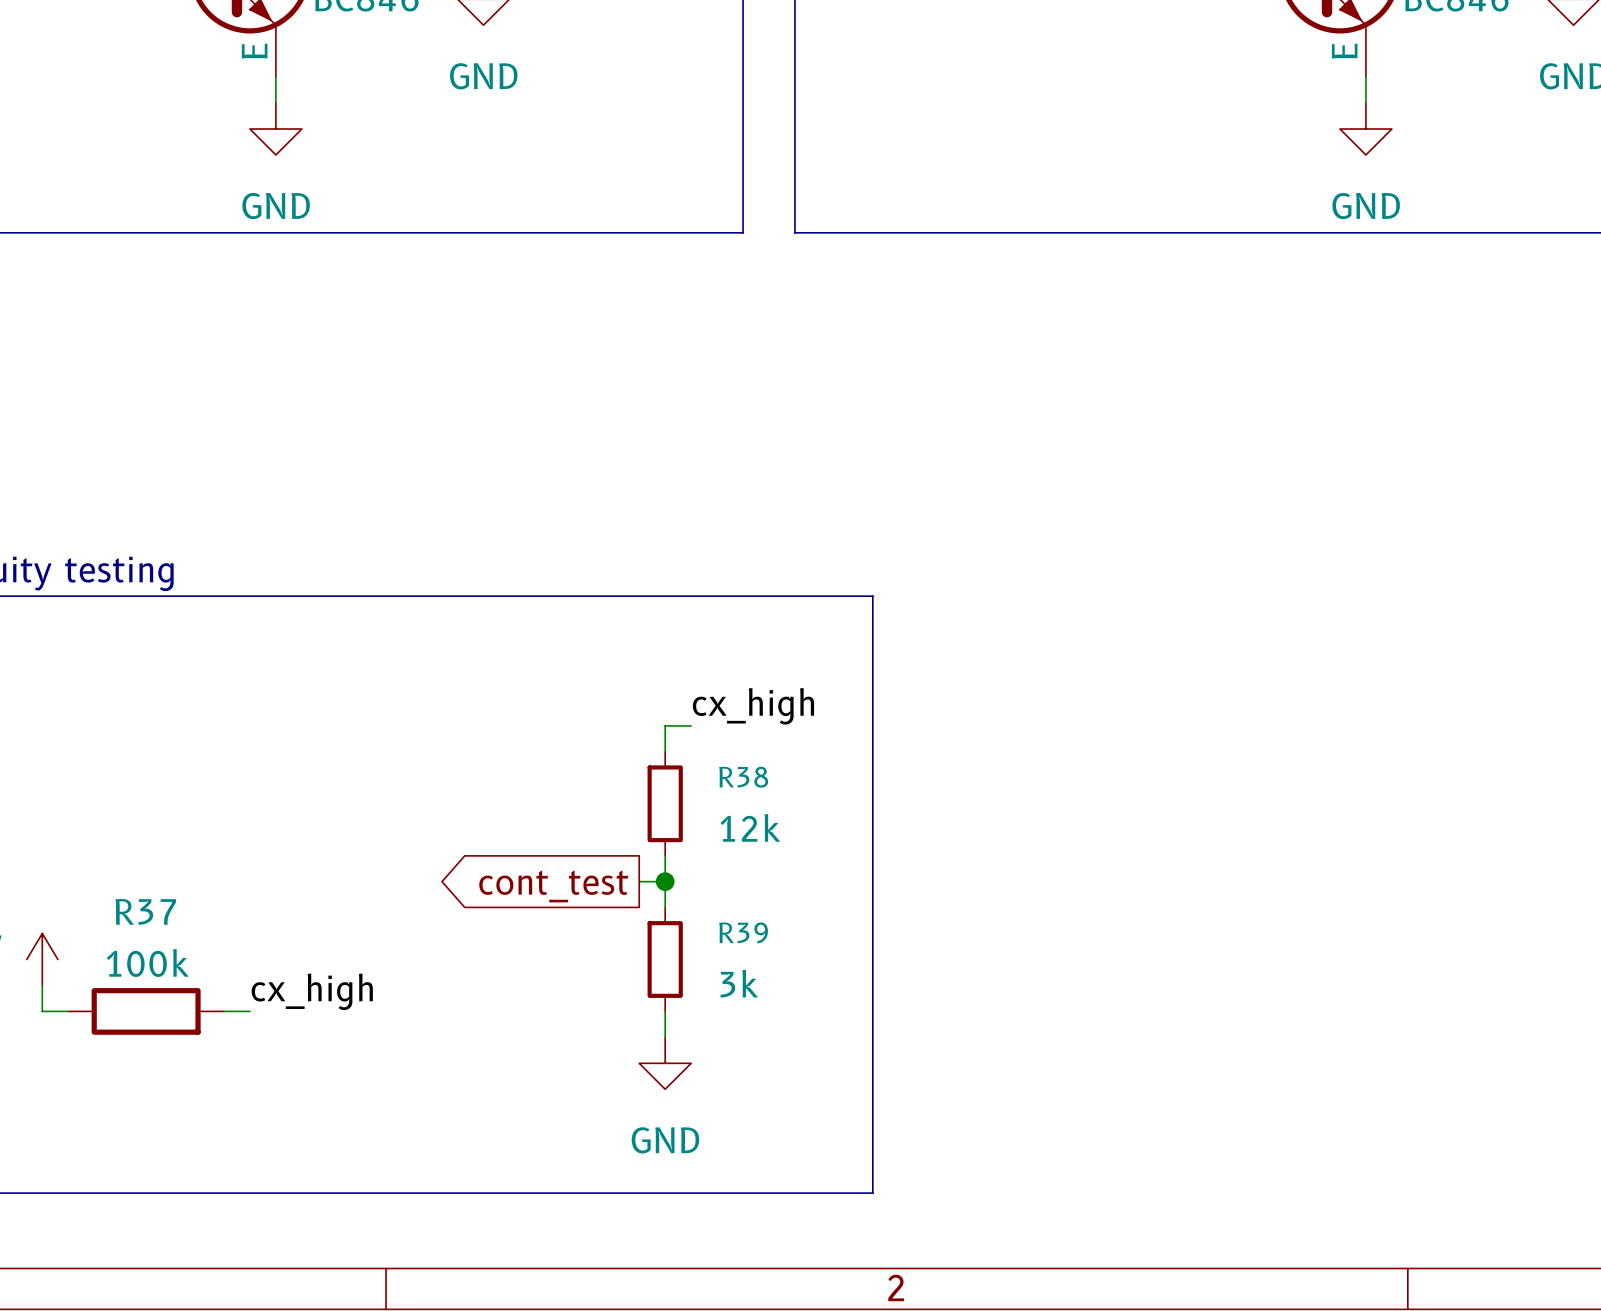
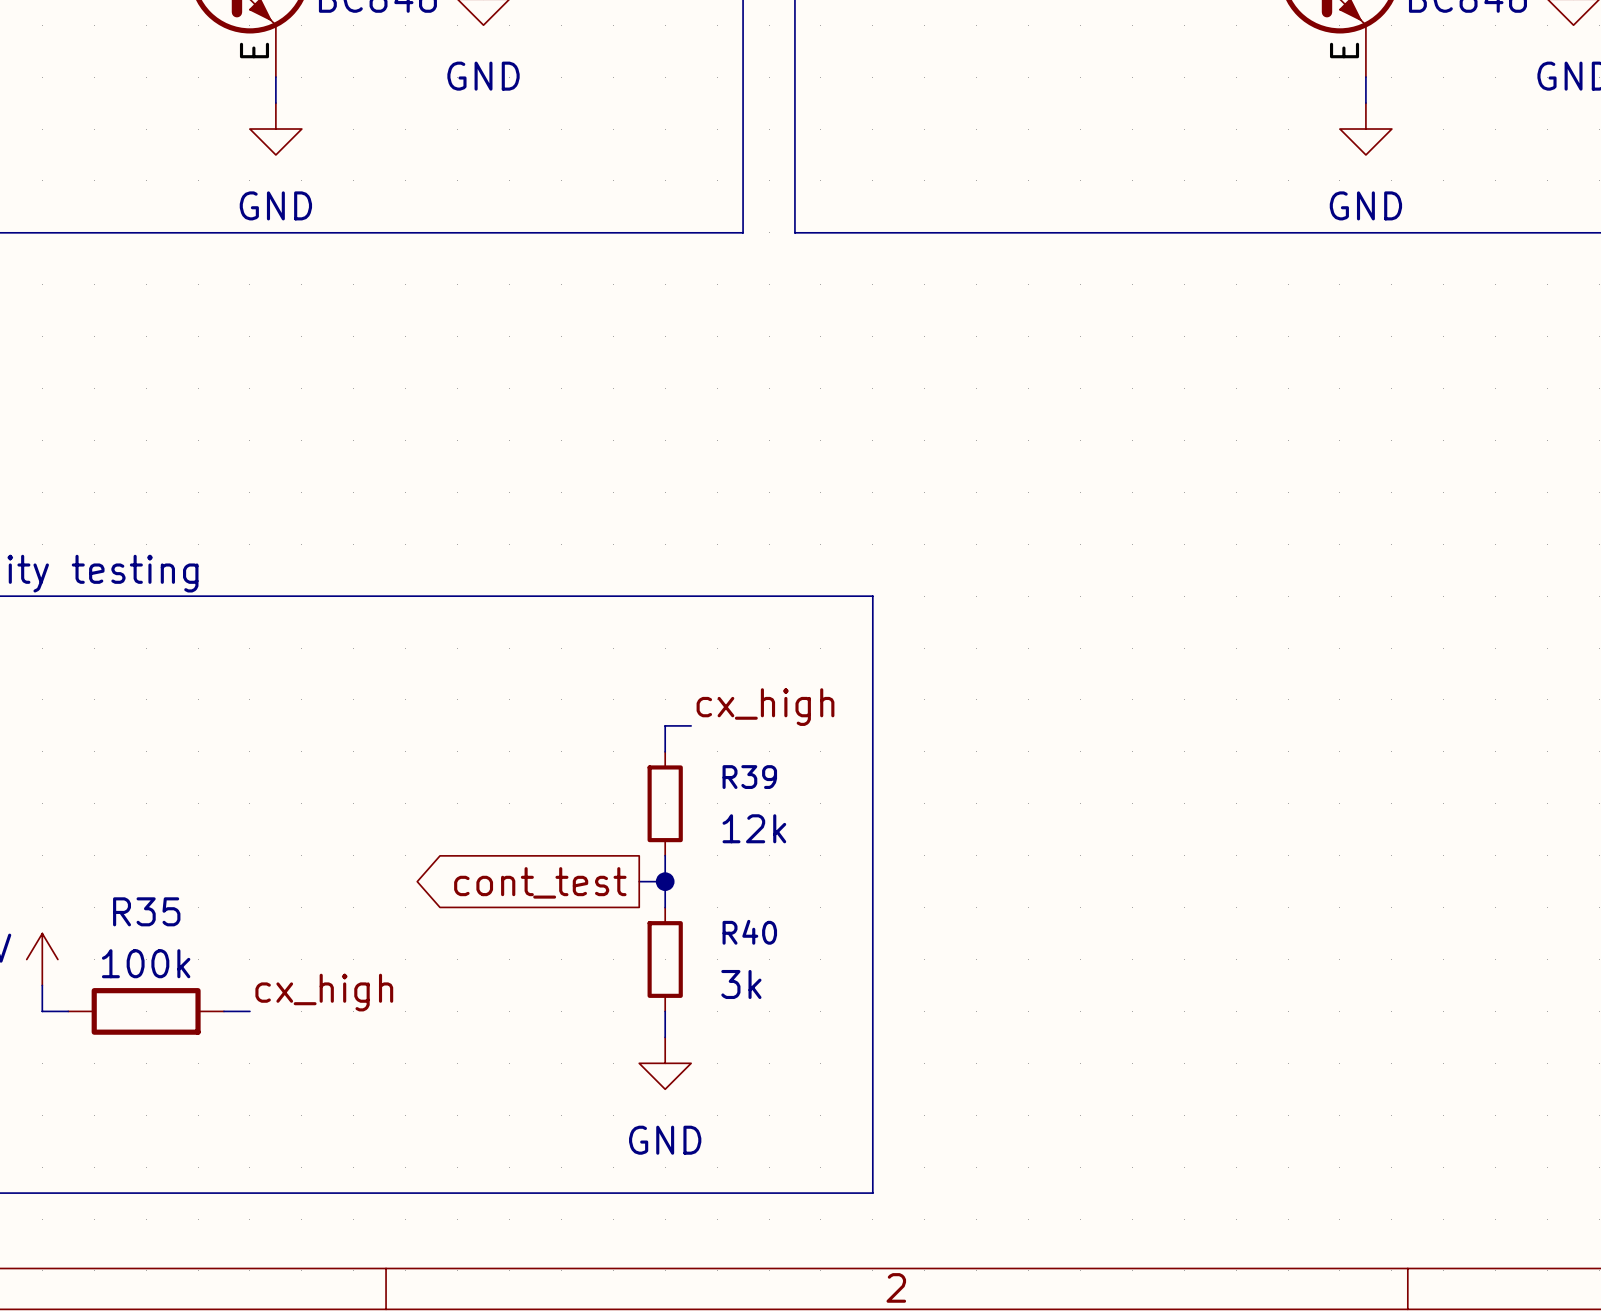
R38 name: R38 (743, 777) -> R39 (749, 777)
R37 name: R37 (145, 911) -> R35 (146, 911)
R39 name: R39 (743, 932) -> R40 (749, 932)

